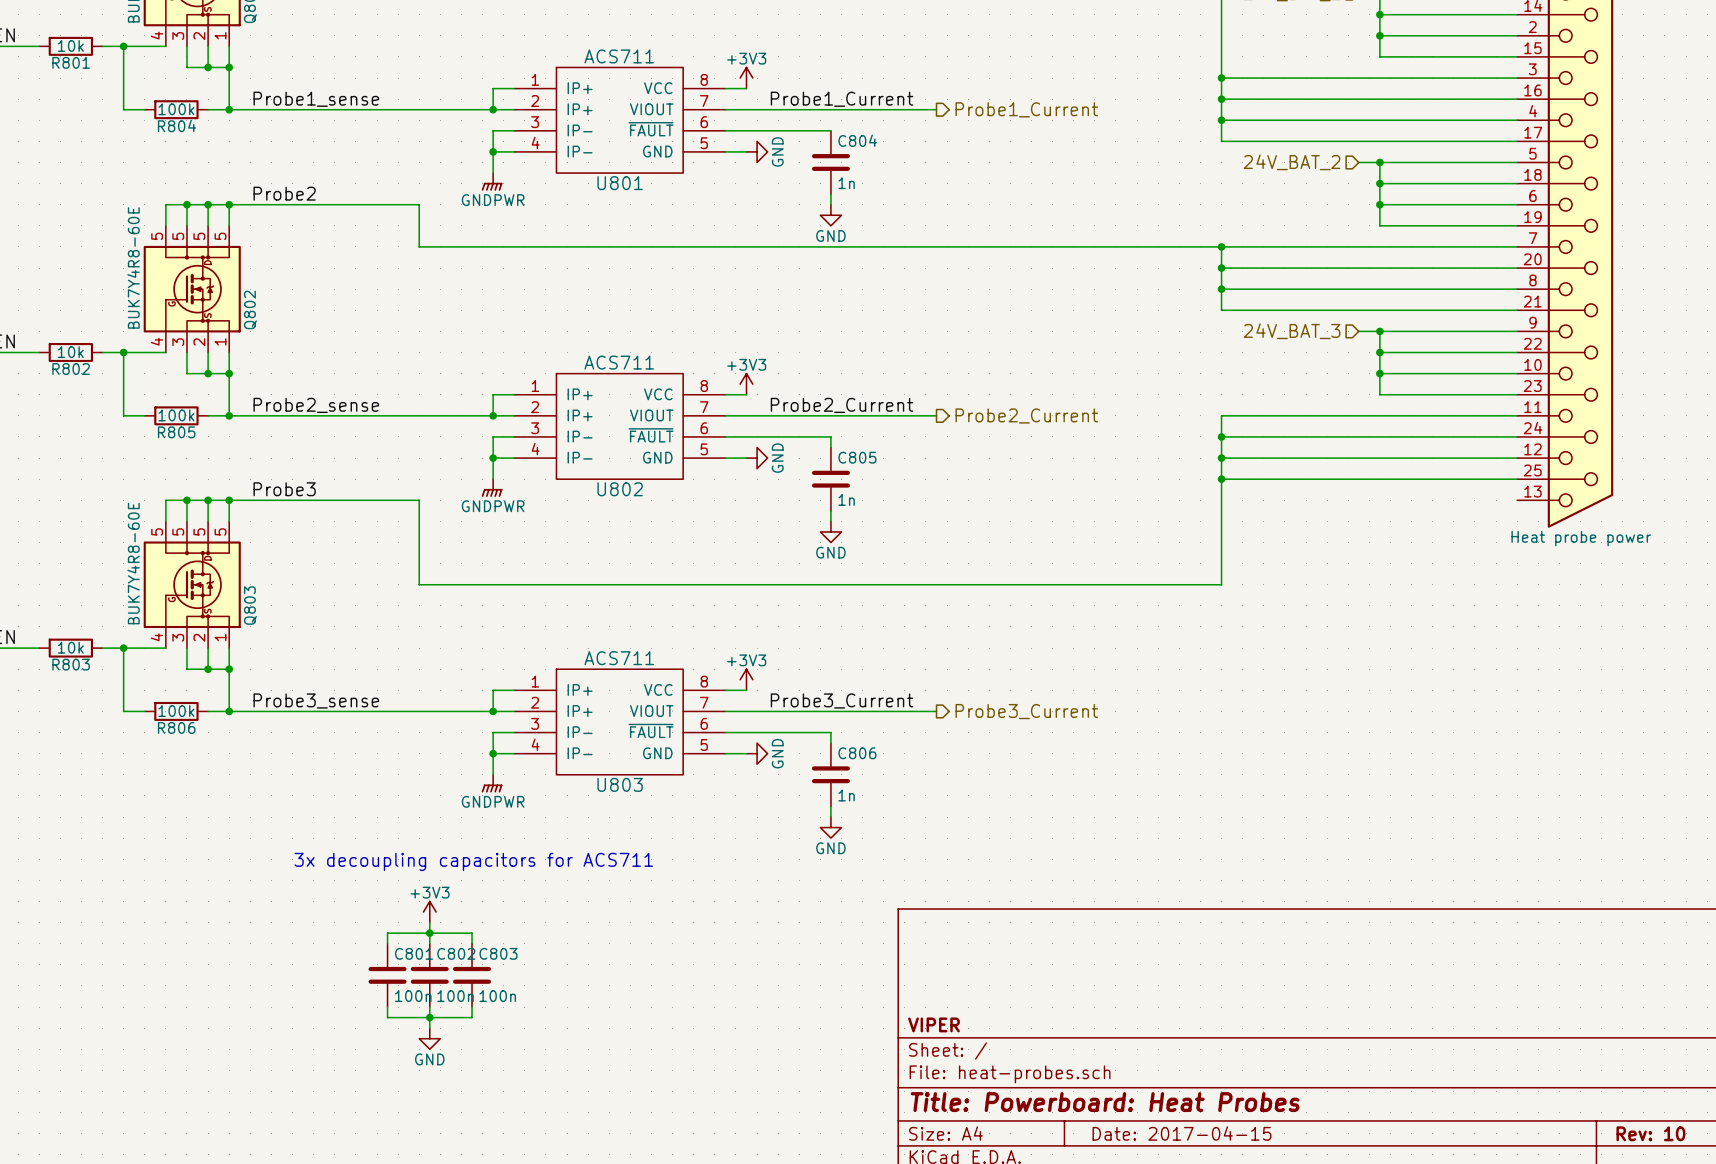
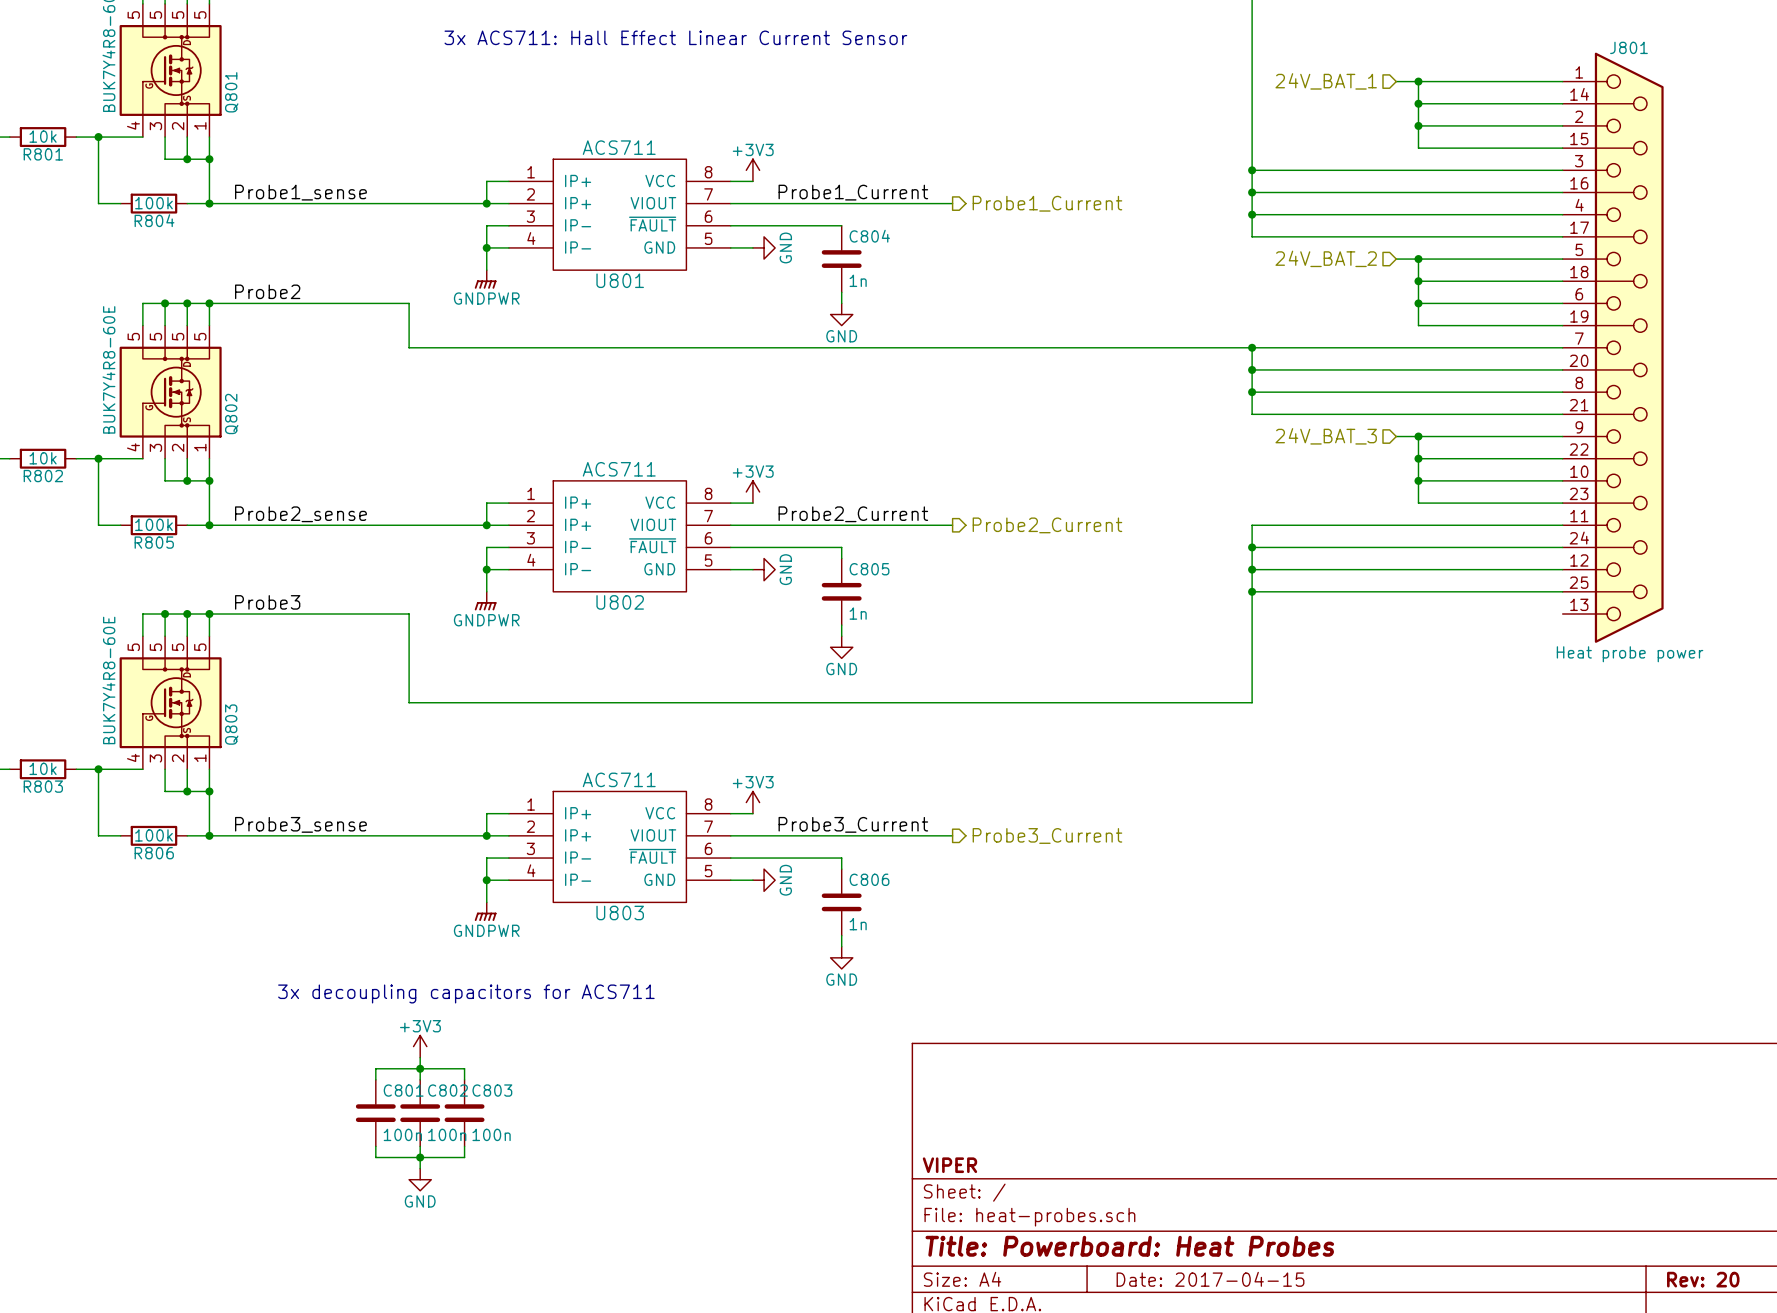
title block: Rev: 10 (1650, 1133) -> Rev: 20 (1703, 1279)

